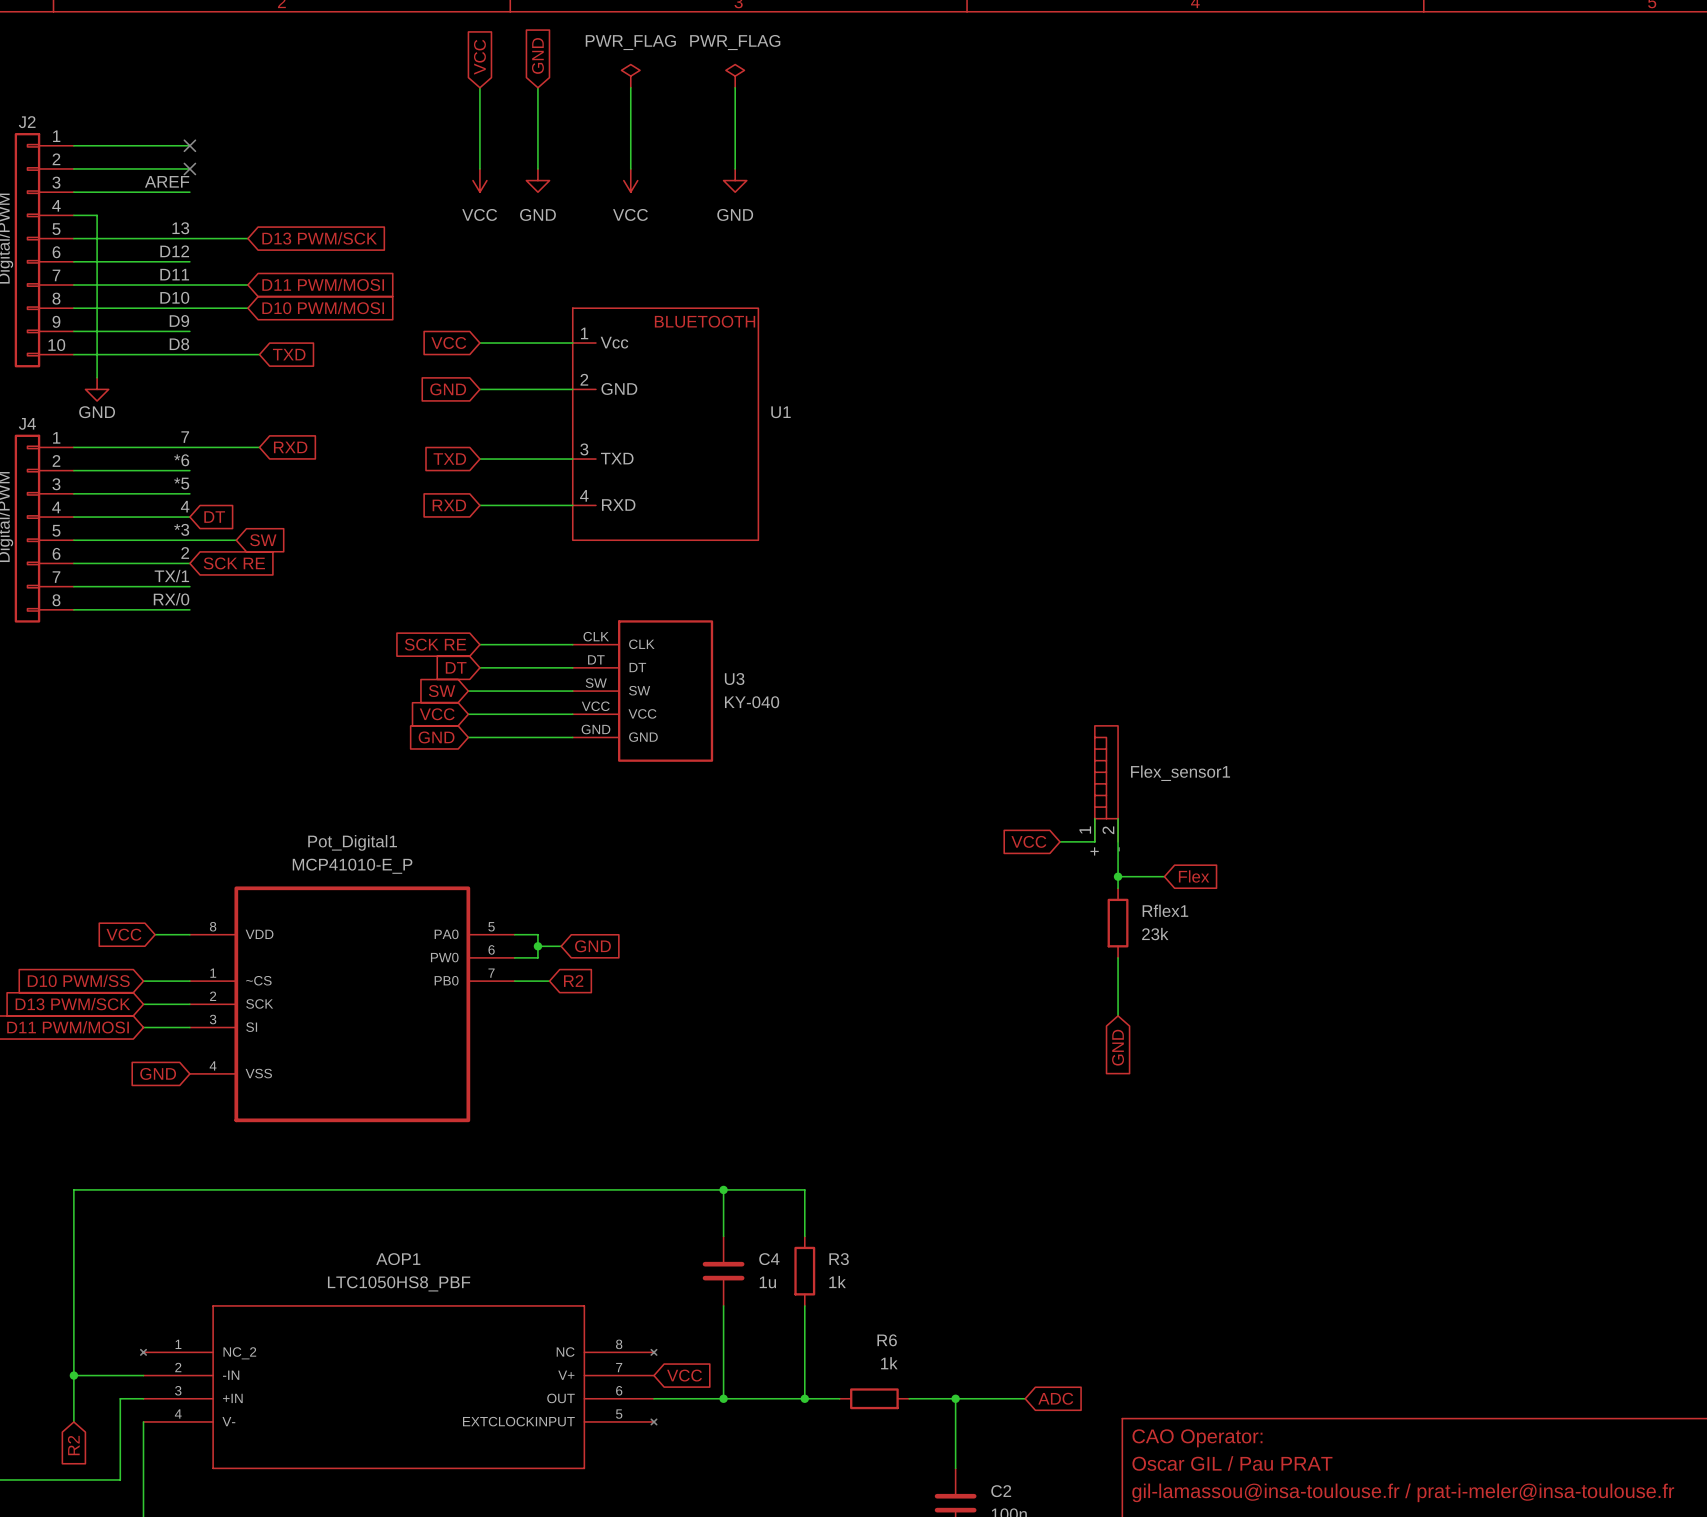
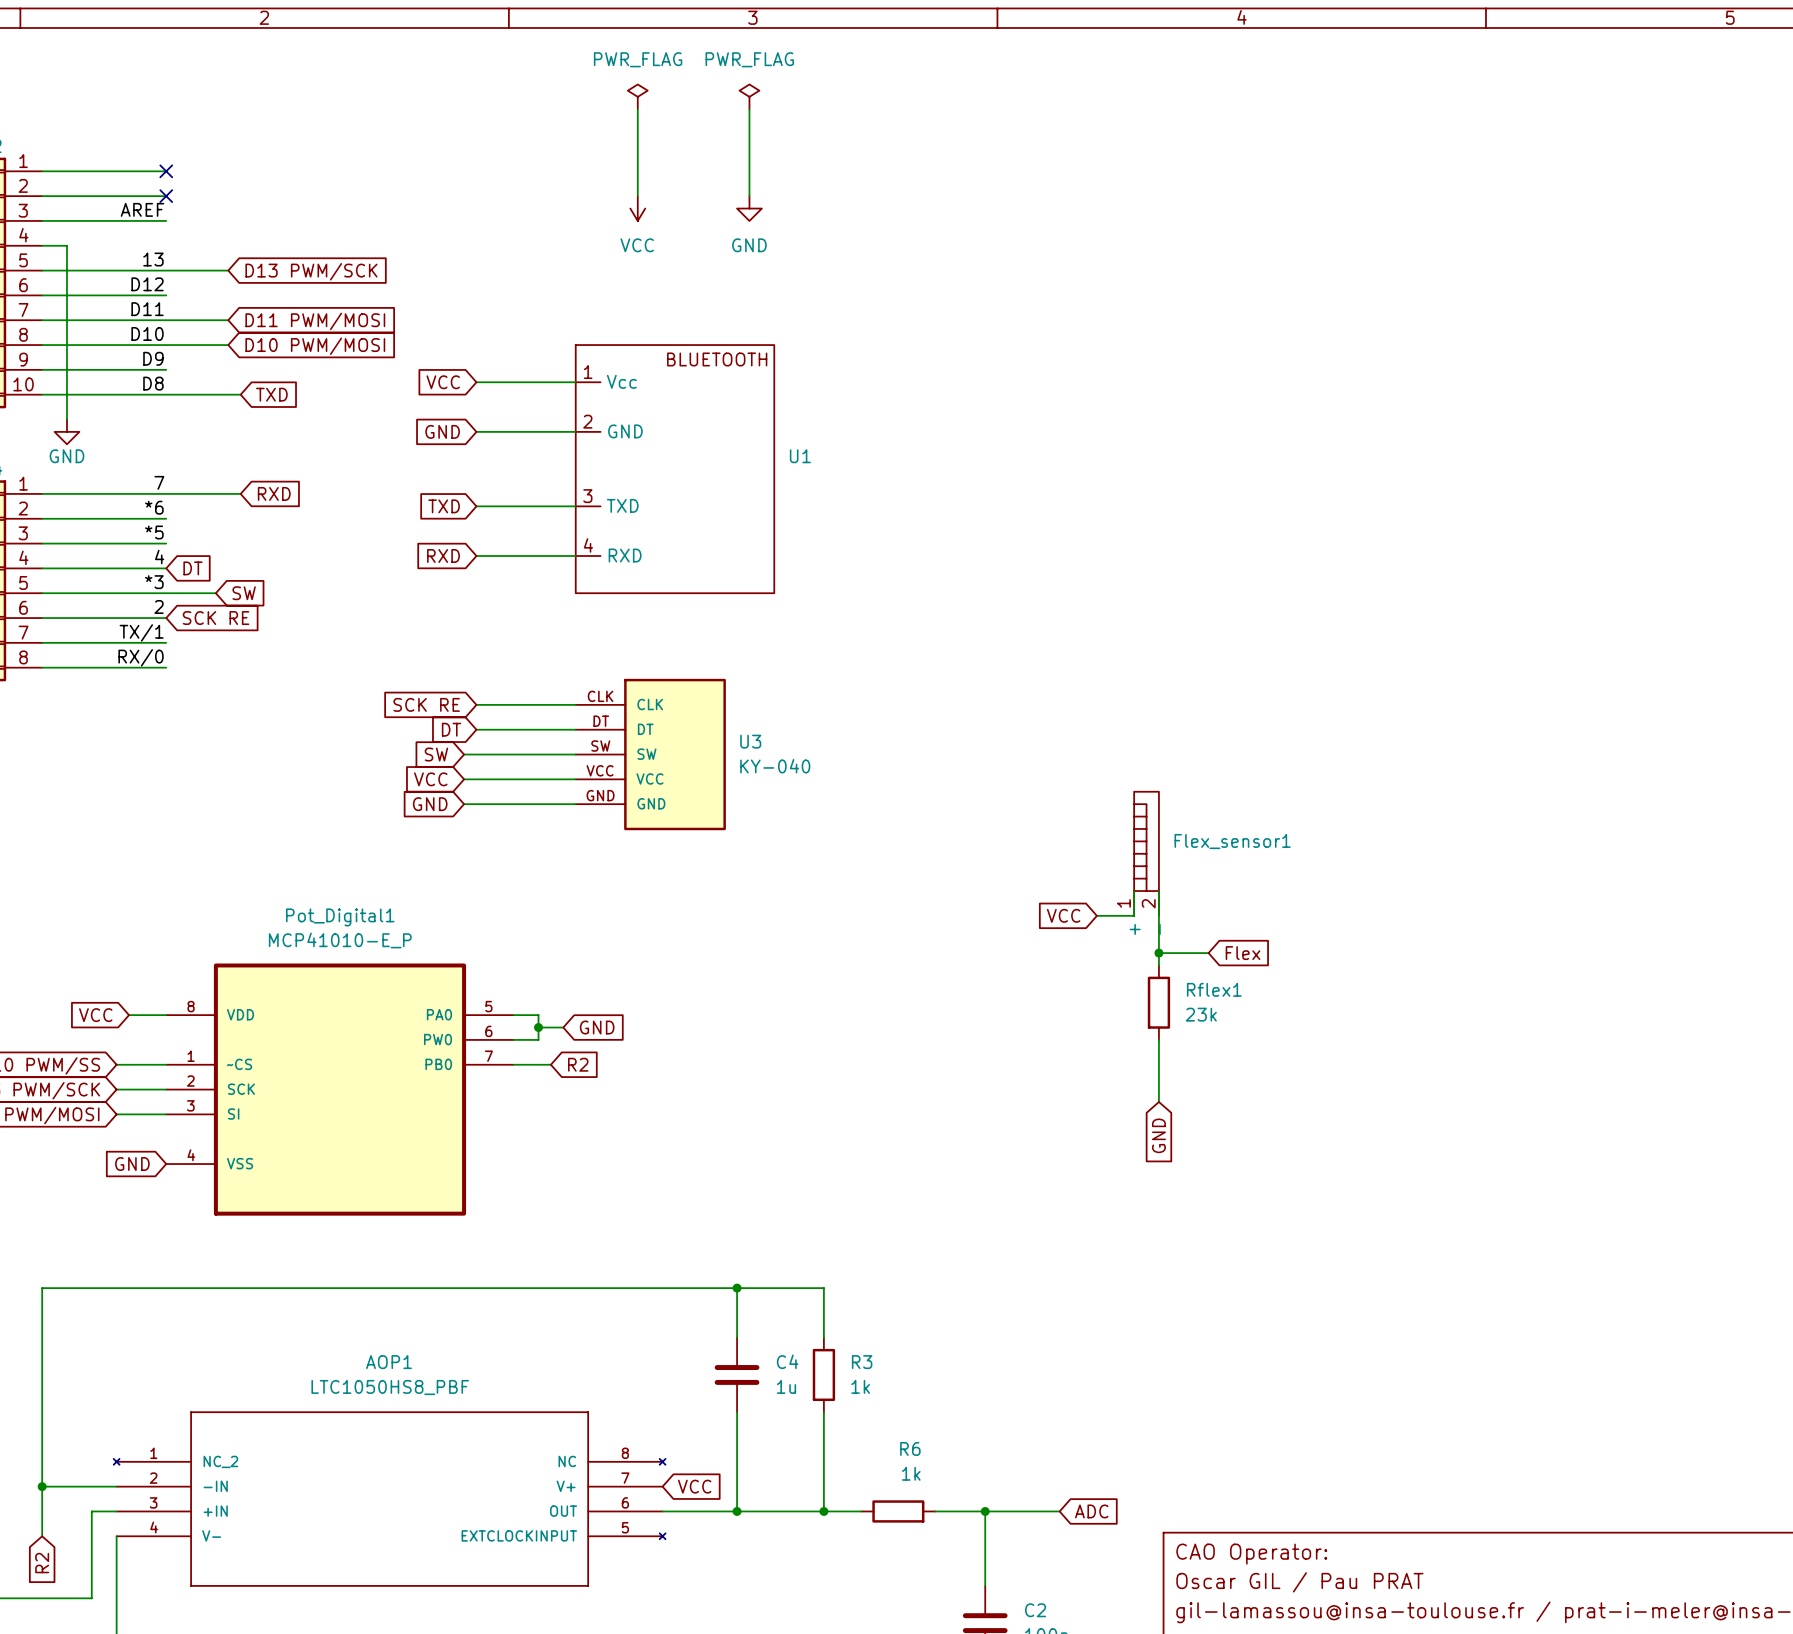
global label: GND (537, 55) -> none
global label: VCC (479, 57) -> none
wire: (479, 87) (479, 168) -> none
wire: (537, 87) (537, 168) -> none
power symbol: VCC (479, 180) -> none
power symbol: GND (537, 180) -> none

